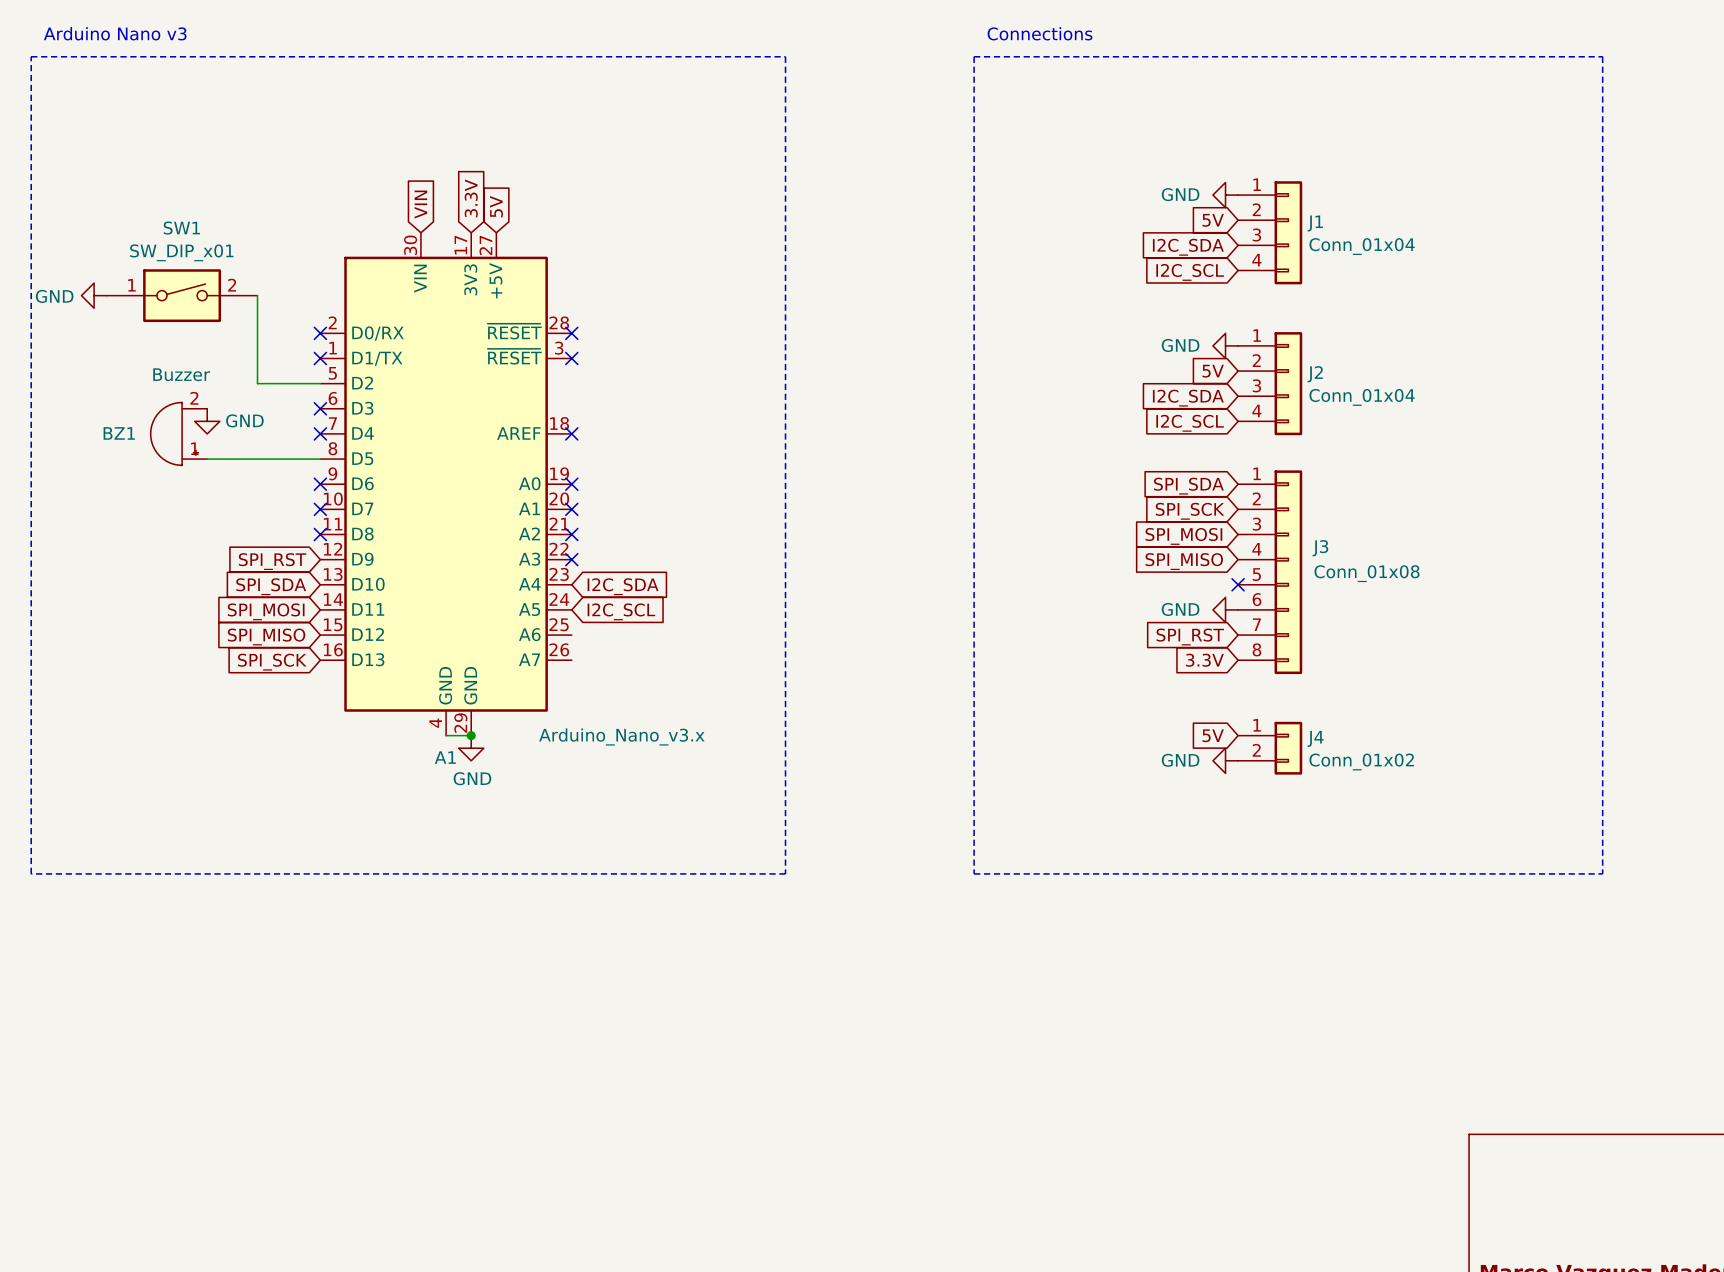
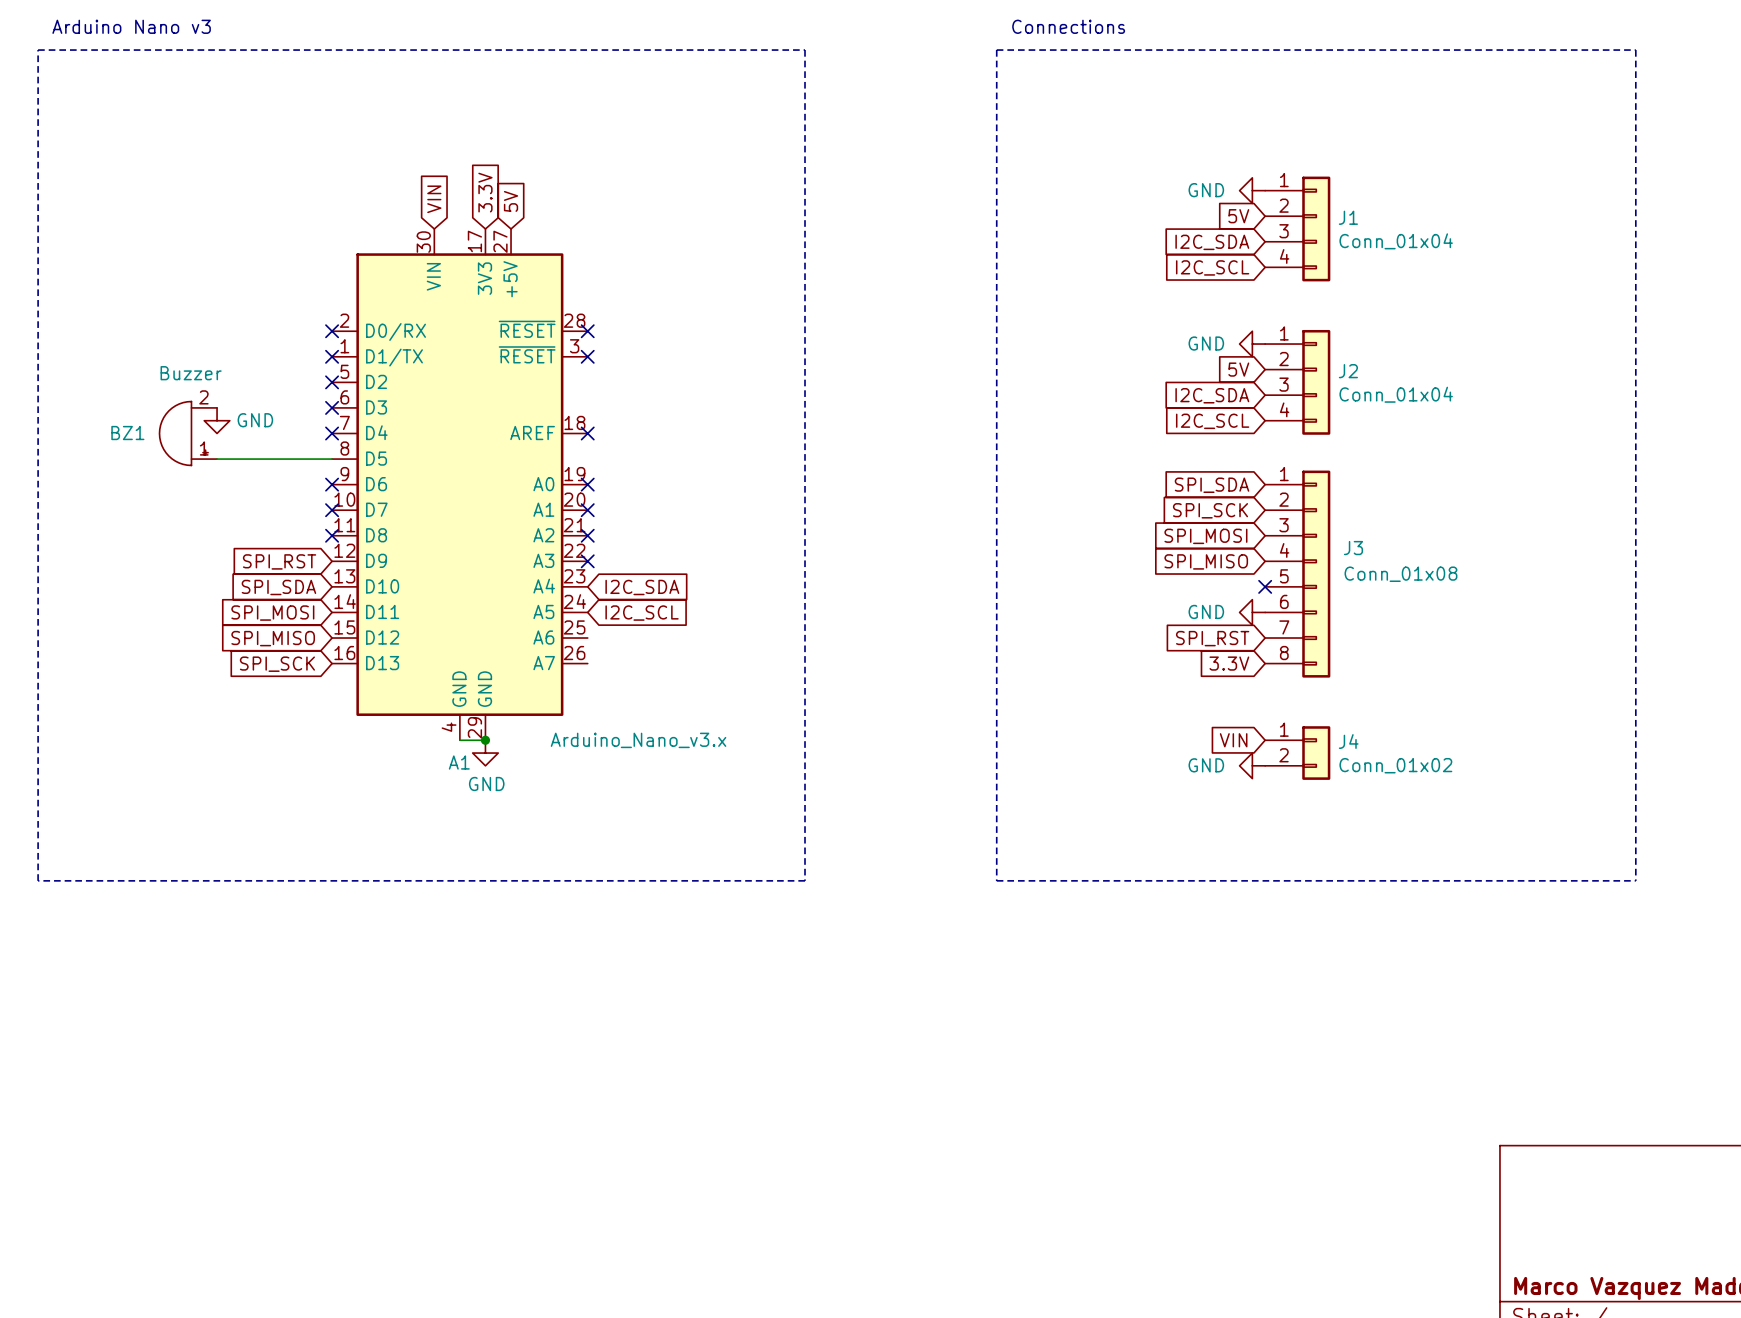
power symbol: GND (94, 295) -> none
SW1: SW_DIP_x01 (182, 295) -> none
wire: (257, 295) (257, 383) (320, 383) -> none
no-connect mark: none -> (332, 382)
global label: 5V (1213, 735) -> VIN (1233, 740)

